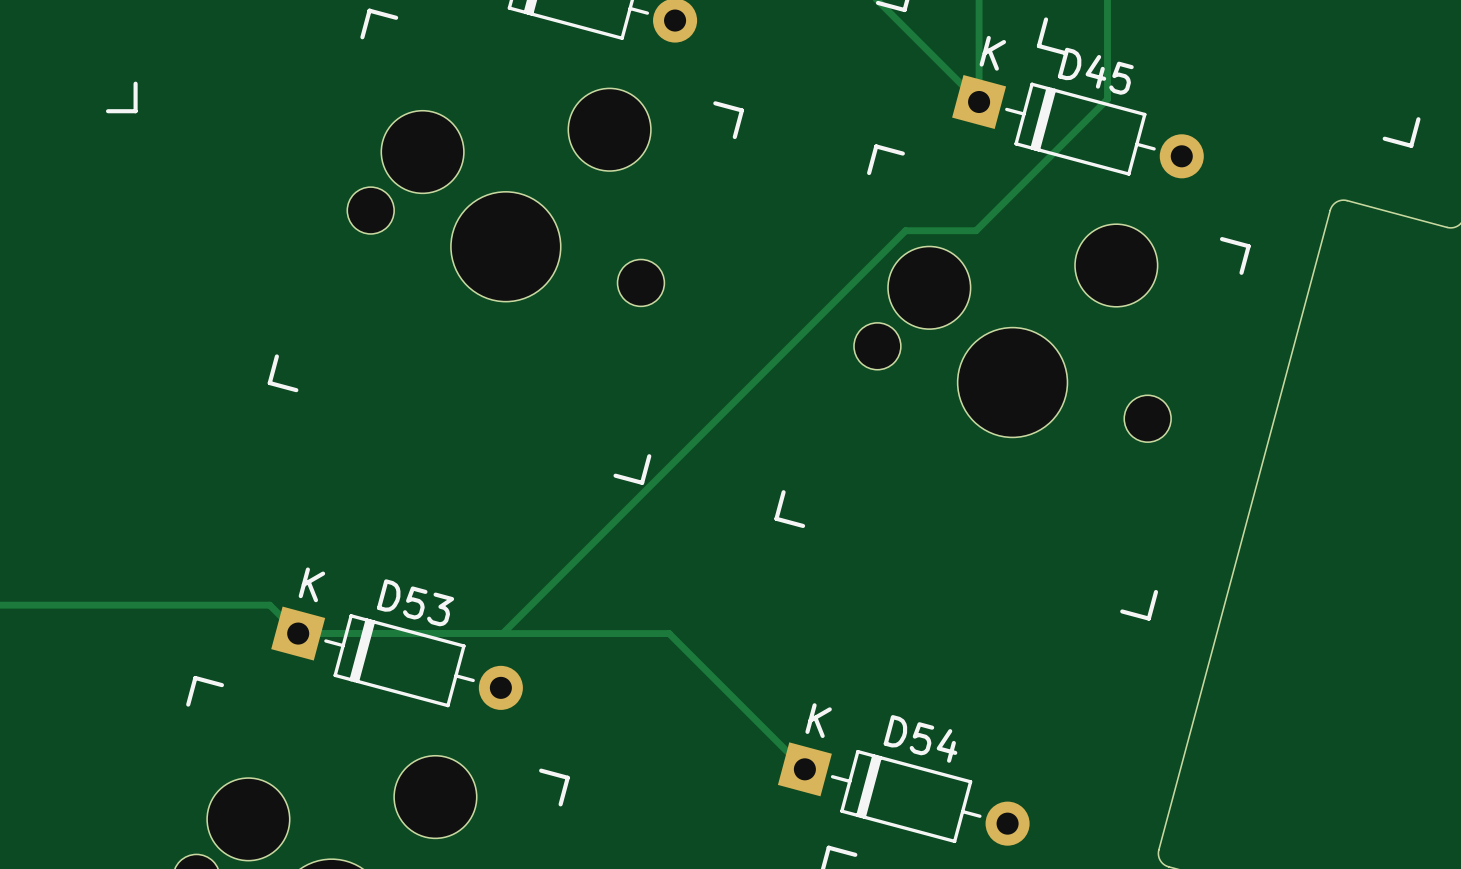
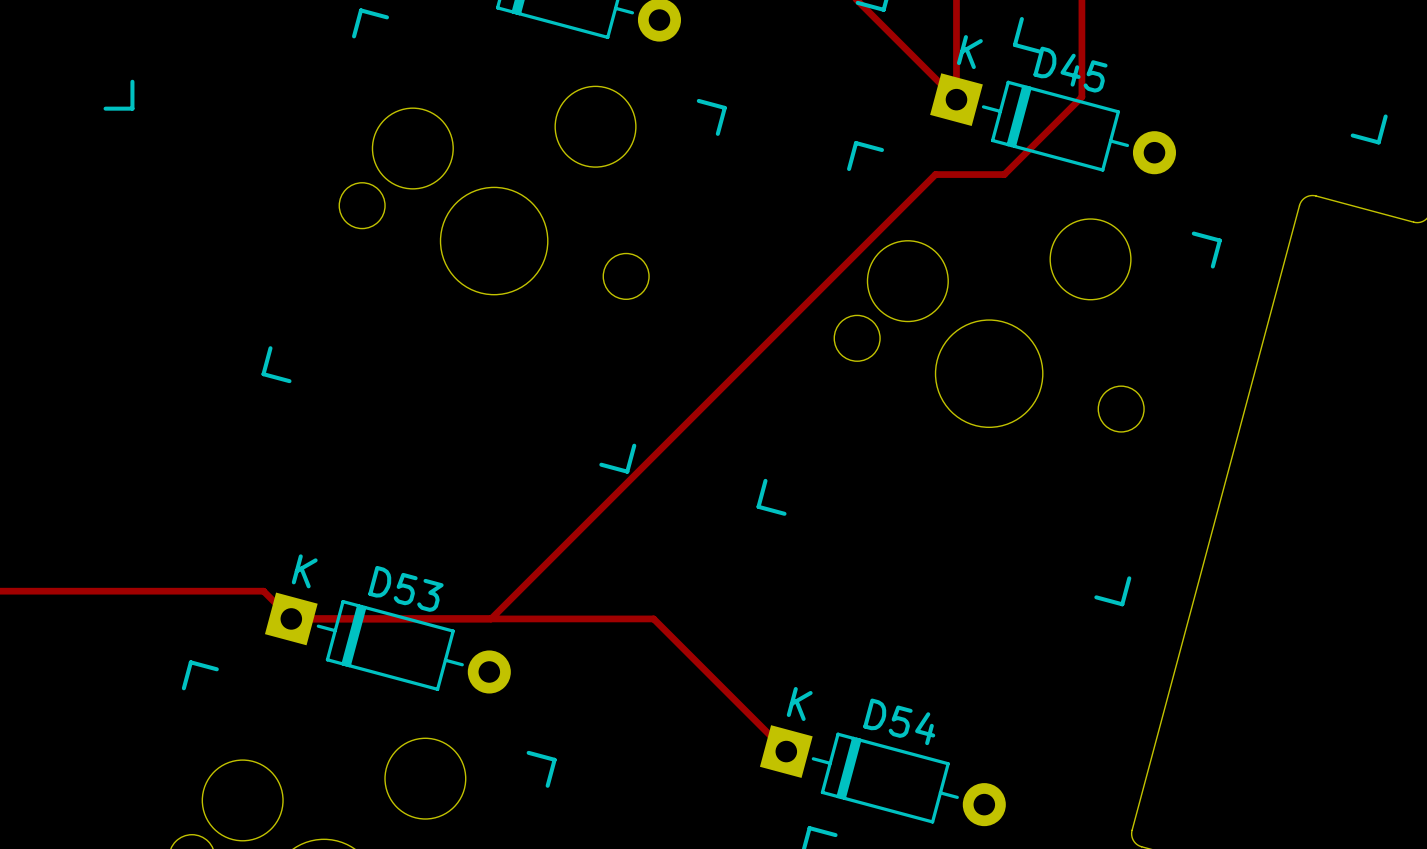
track: (1028, 178) (976, 230) (905, 230) -> (1004, 174) (935, 174) (884, 225)

